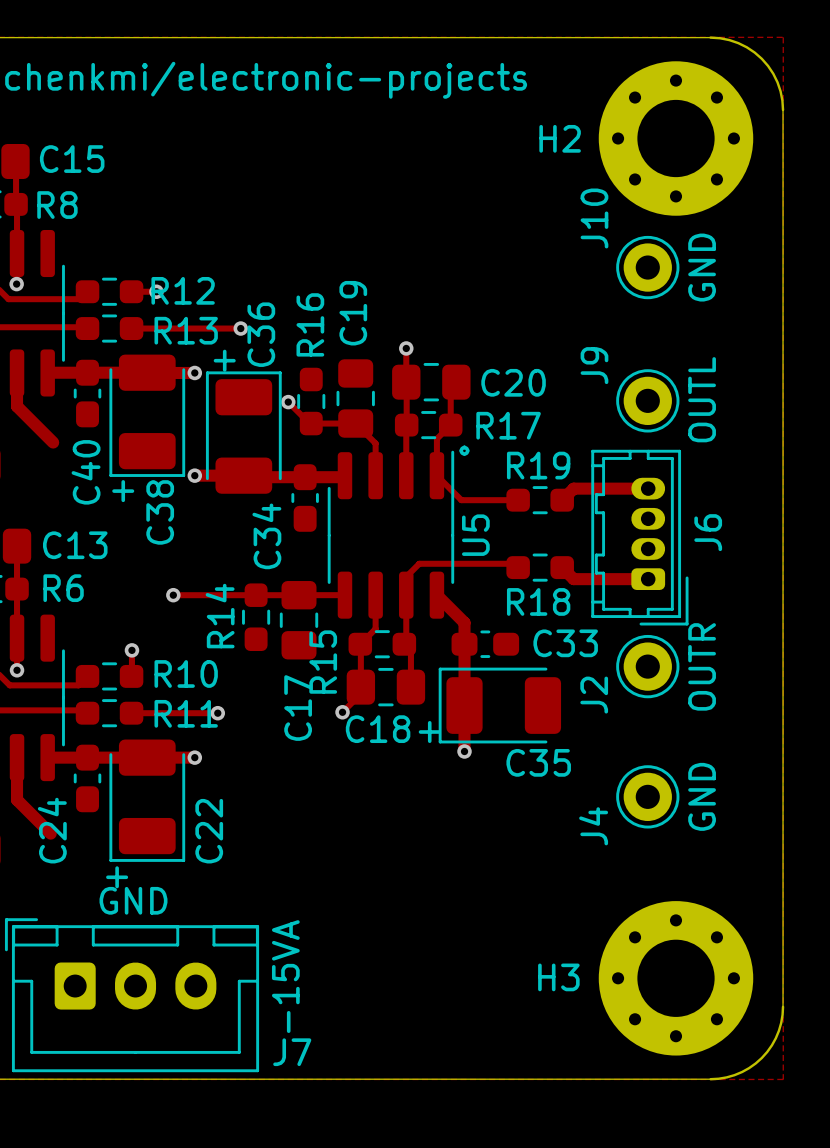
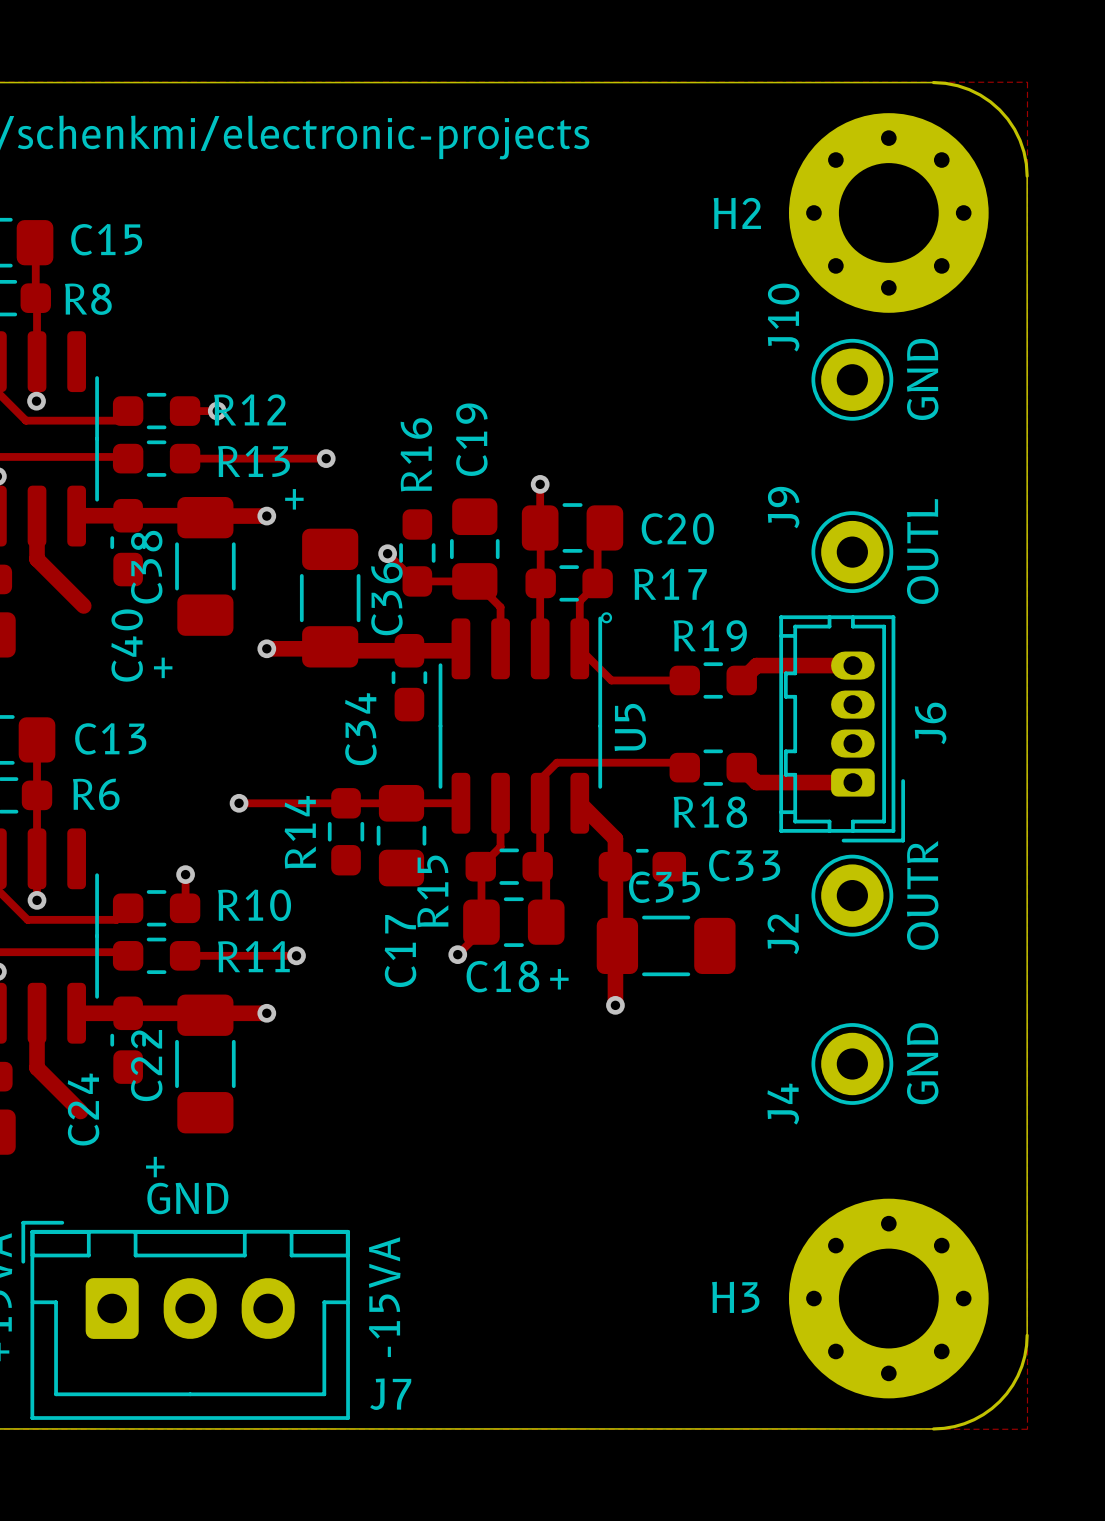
C36 name position: C36 (261, 334) -> C36 (386, 598)
C38 footprint: [109, 354, 186, 477] -> [175, 496, 236, 636]
C36 footprint: [205, 371, 282, 494] -> [299, 528, 361, 668]
C38 name position: C38 (160, 512) -> C38 (146, 567)
C35 footprint: [438, 667, 562, 744] -> [596, 915, 736, 977]
C22 footprint: [109, 739, 186, 862] -> [175, 994, 236, 1134]
C35 name position: C35 (538, 762) -> C35 (664, 887)
C22 name position: C22 (209, 831) -> C22 (146, 1065)

